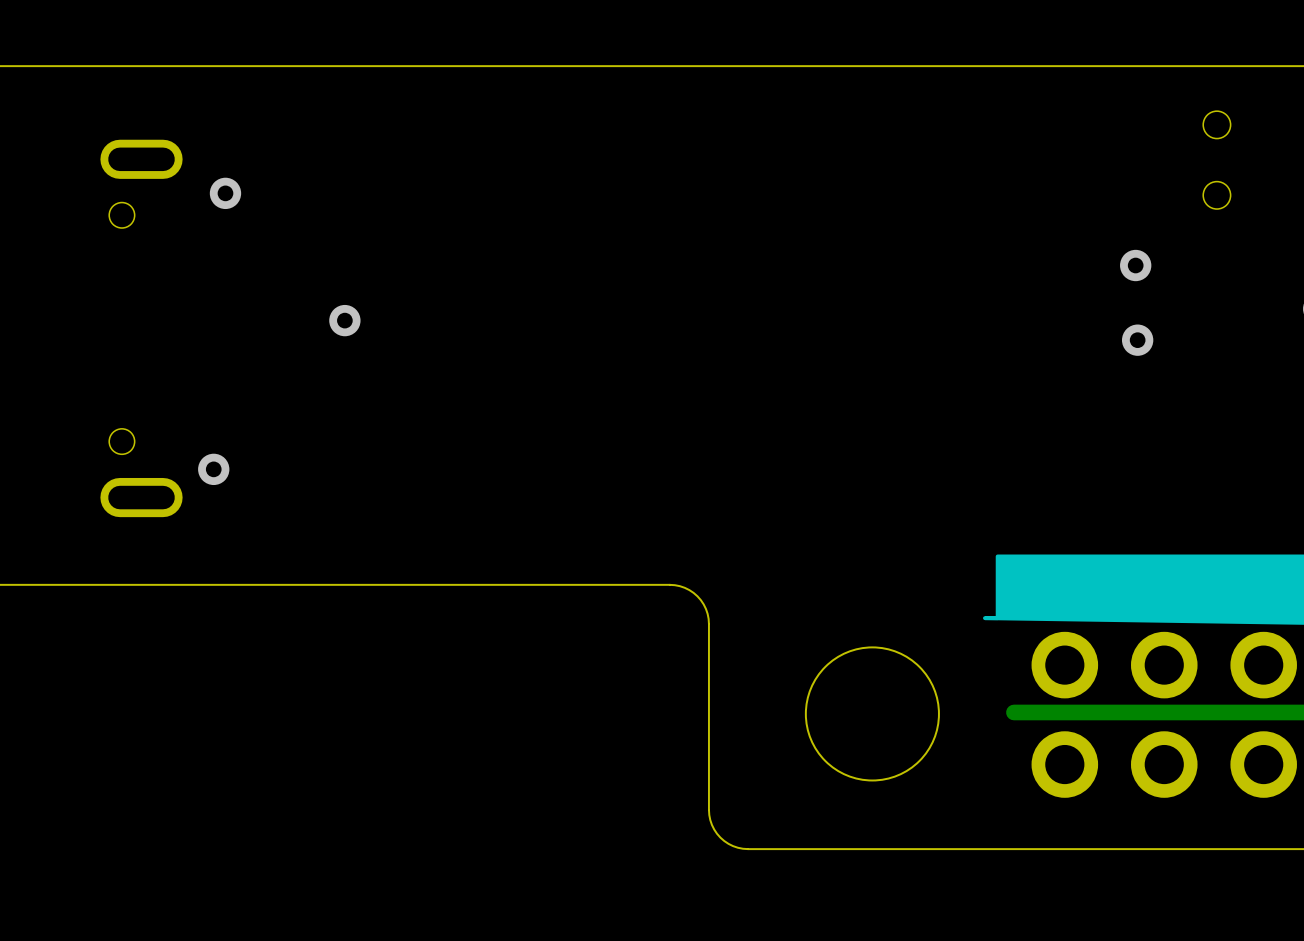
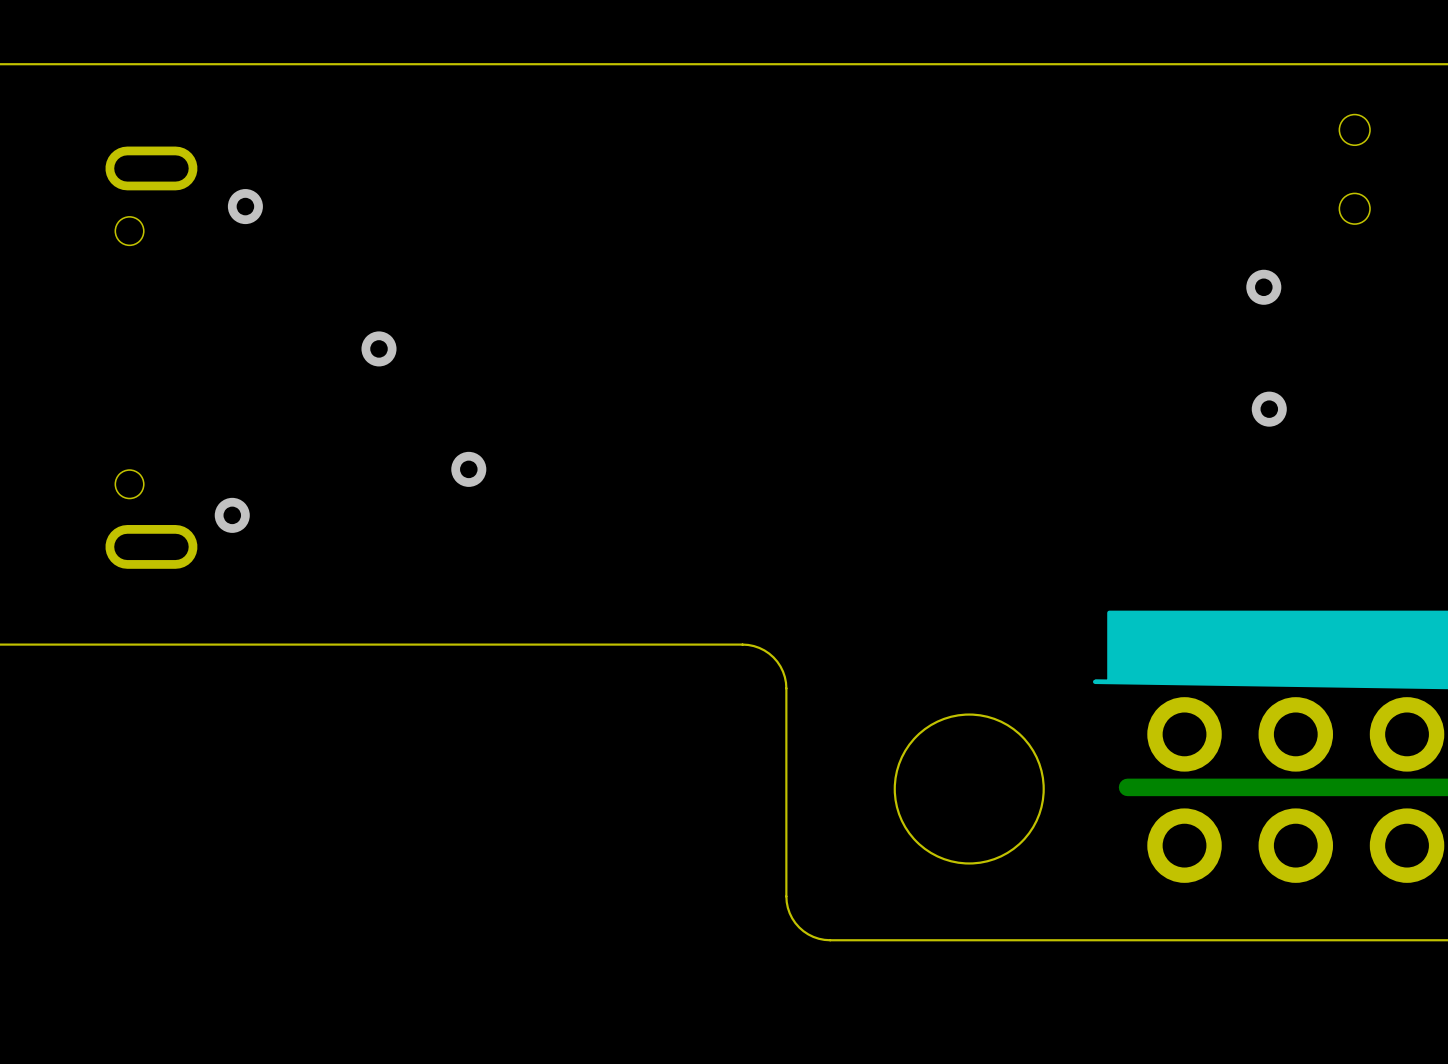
via position: (1137, 340) -> (1269, 409)
via: none -> (468, 469)

